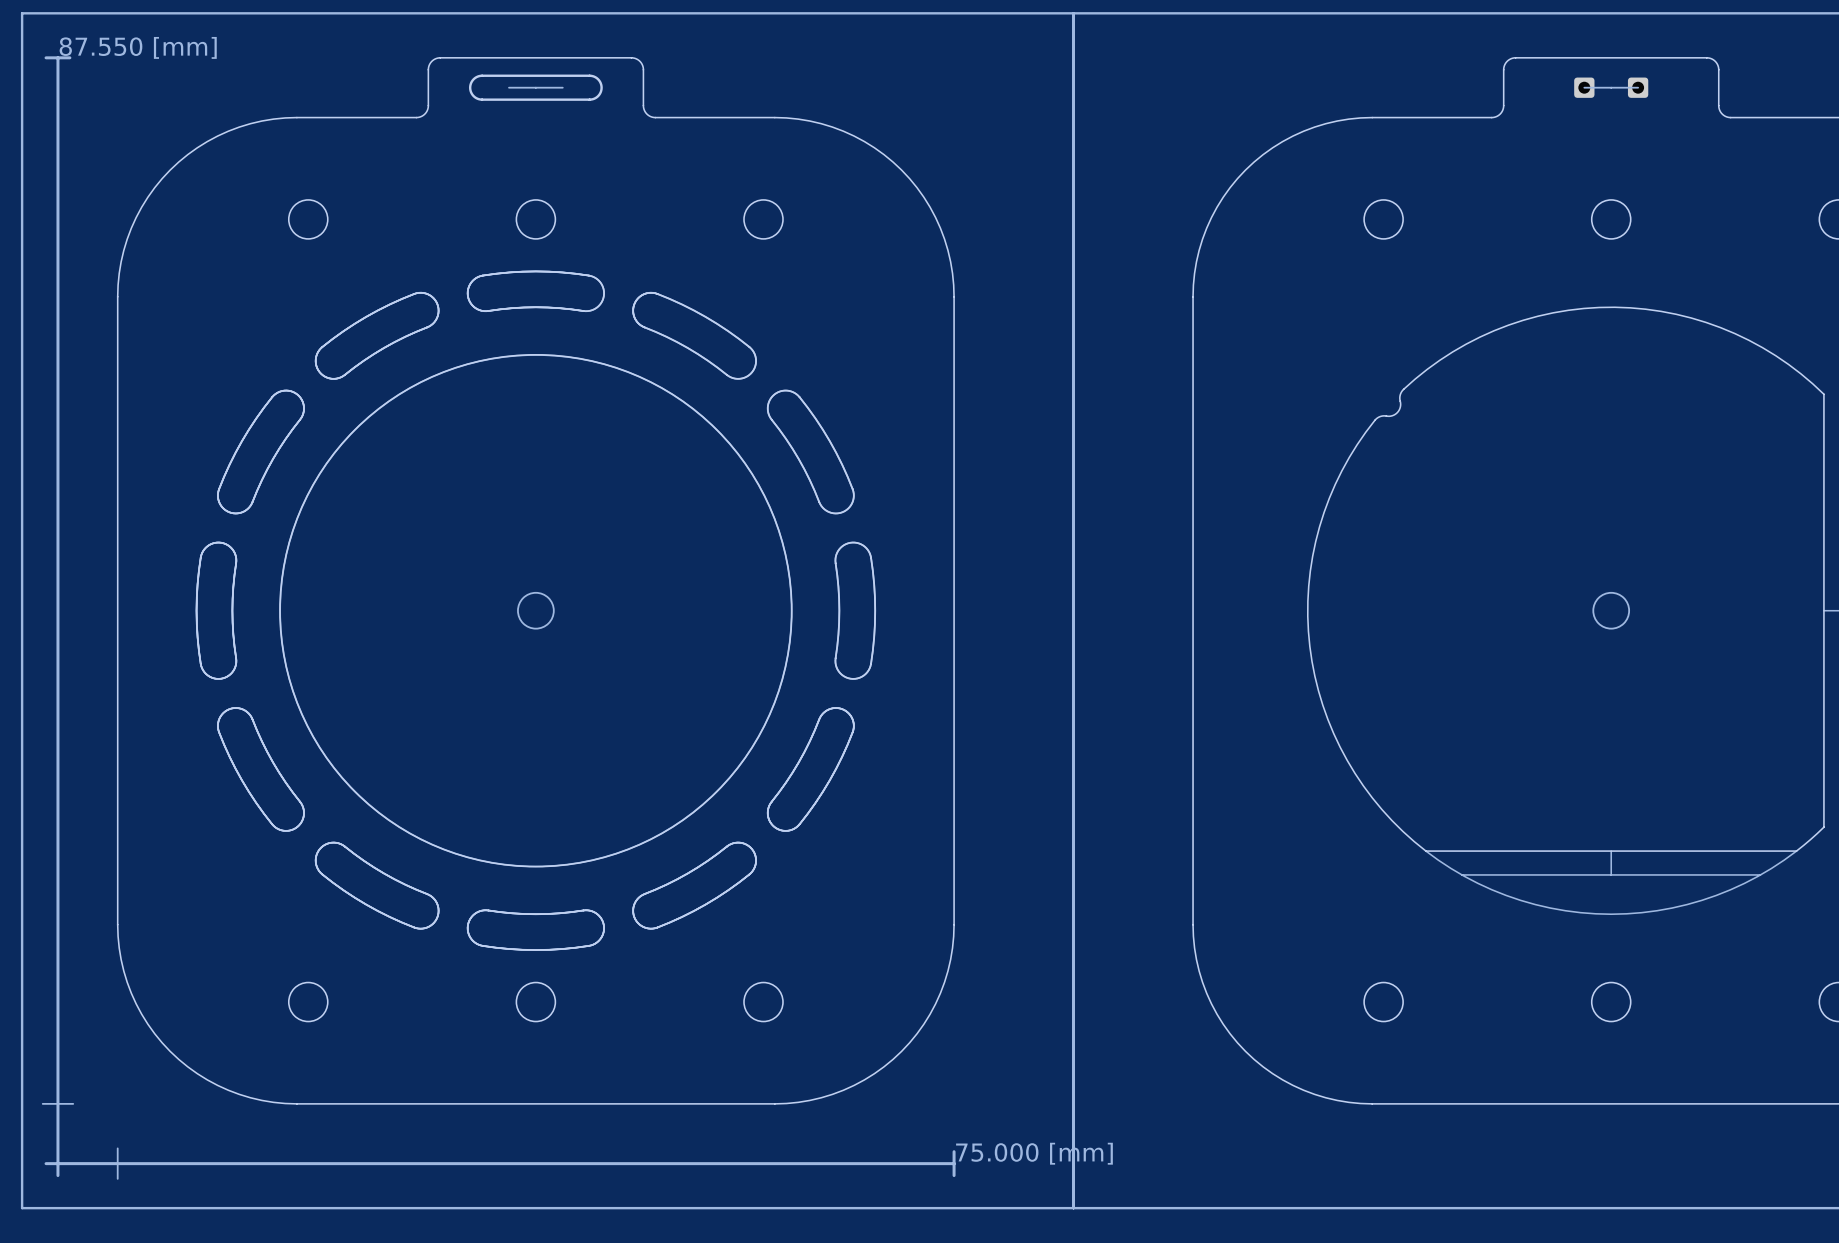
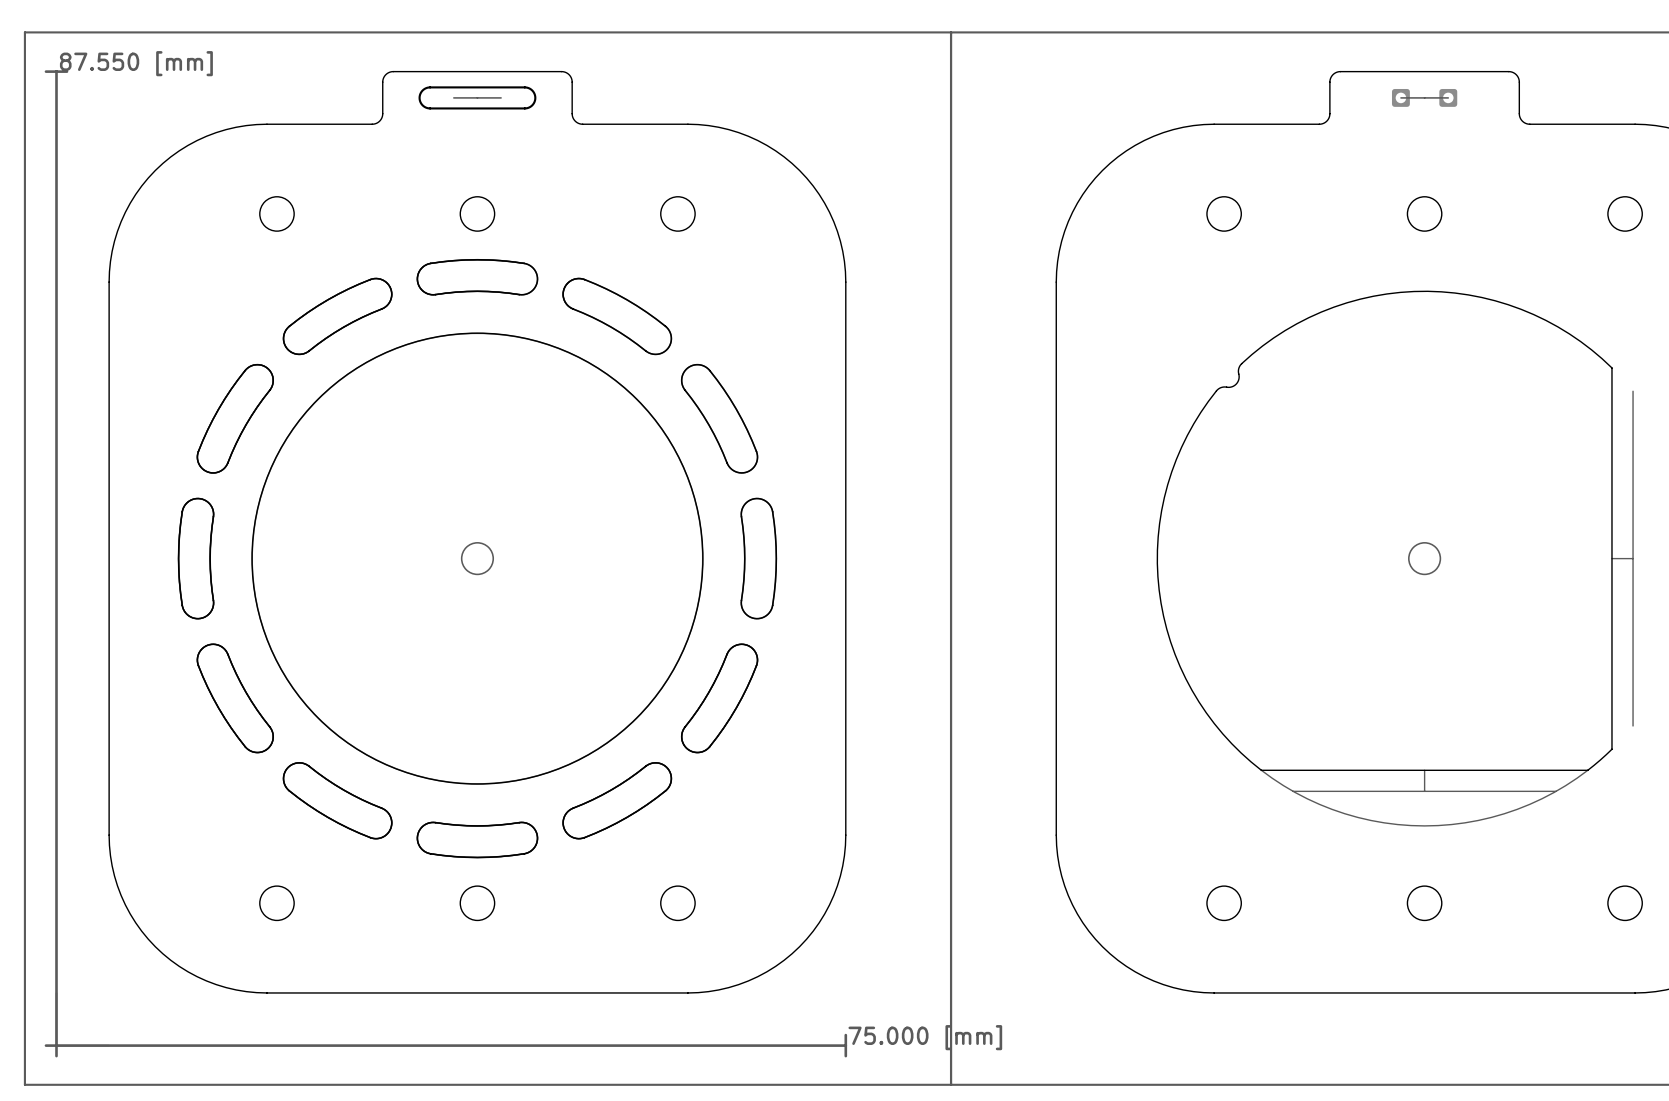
line: (42, 1103) (73, 1103) -> none
line: (117, 1148) (117, 1178) -> none

